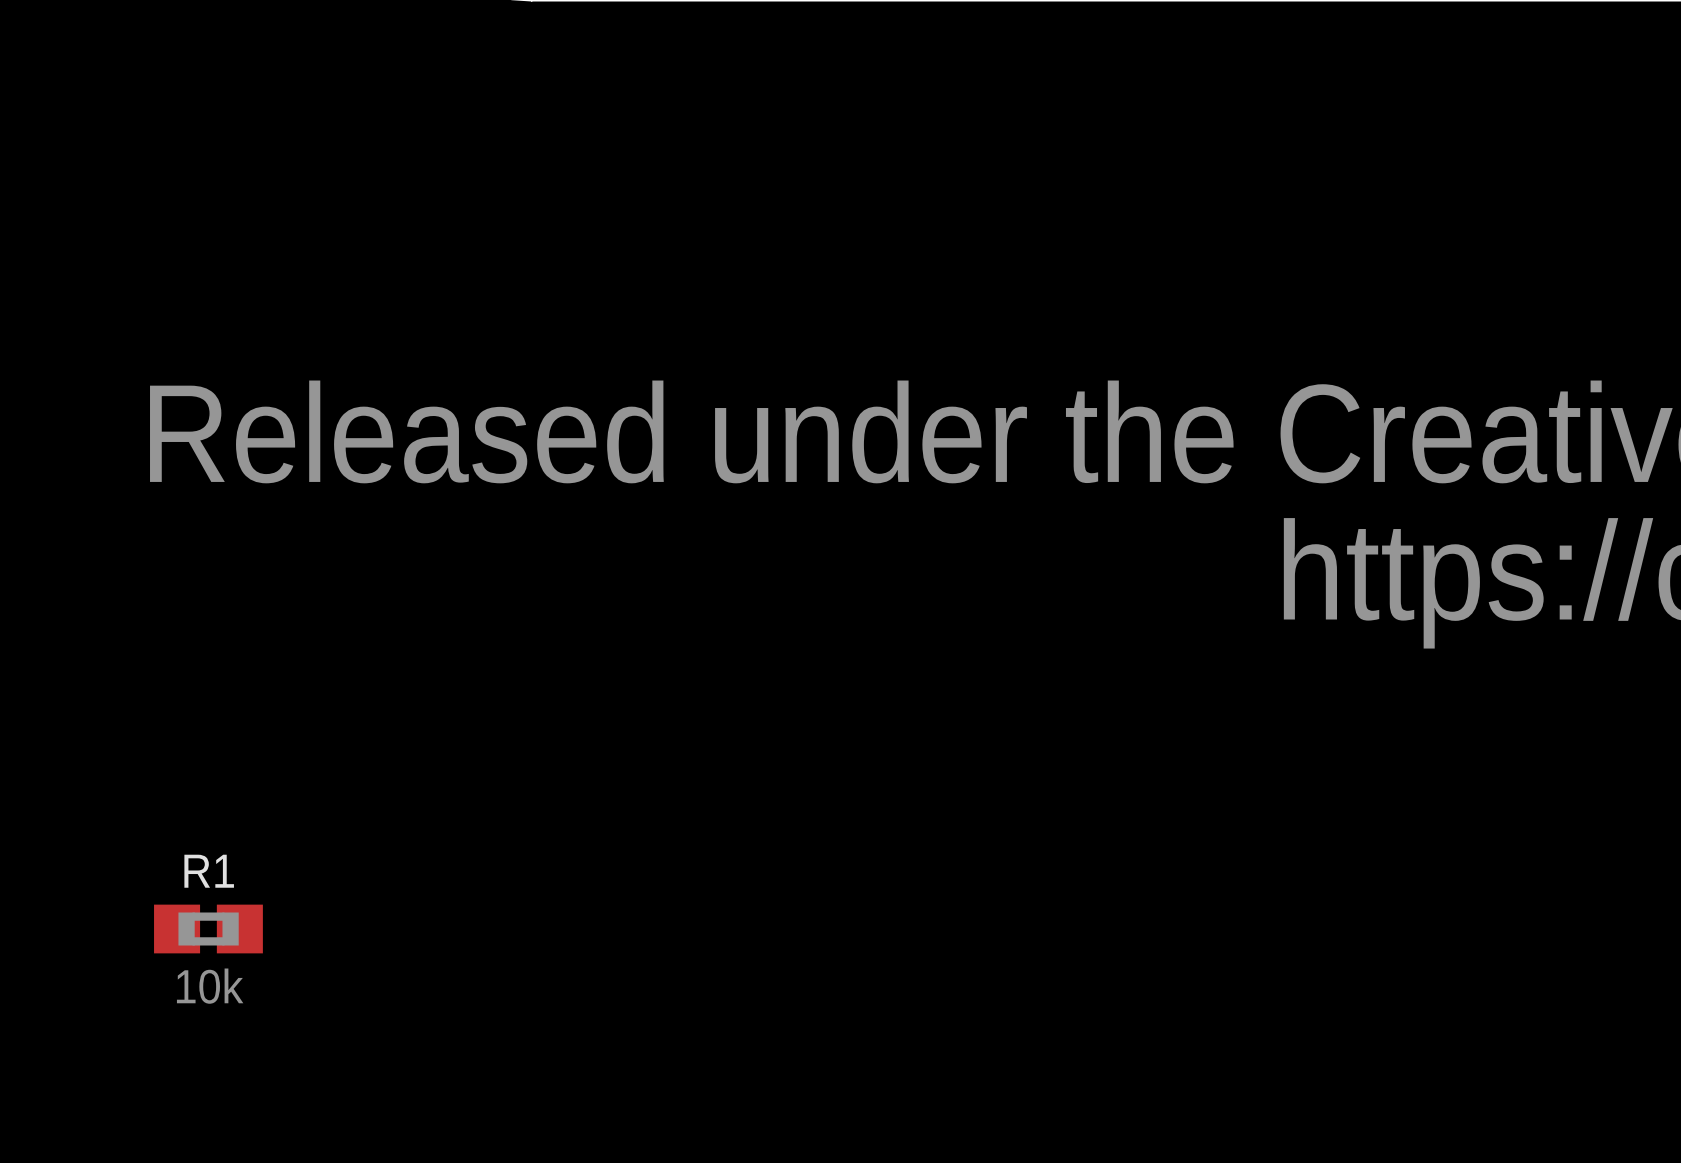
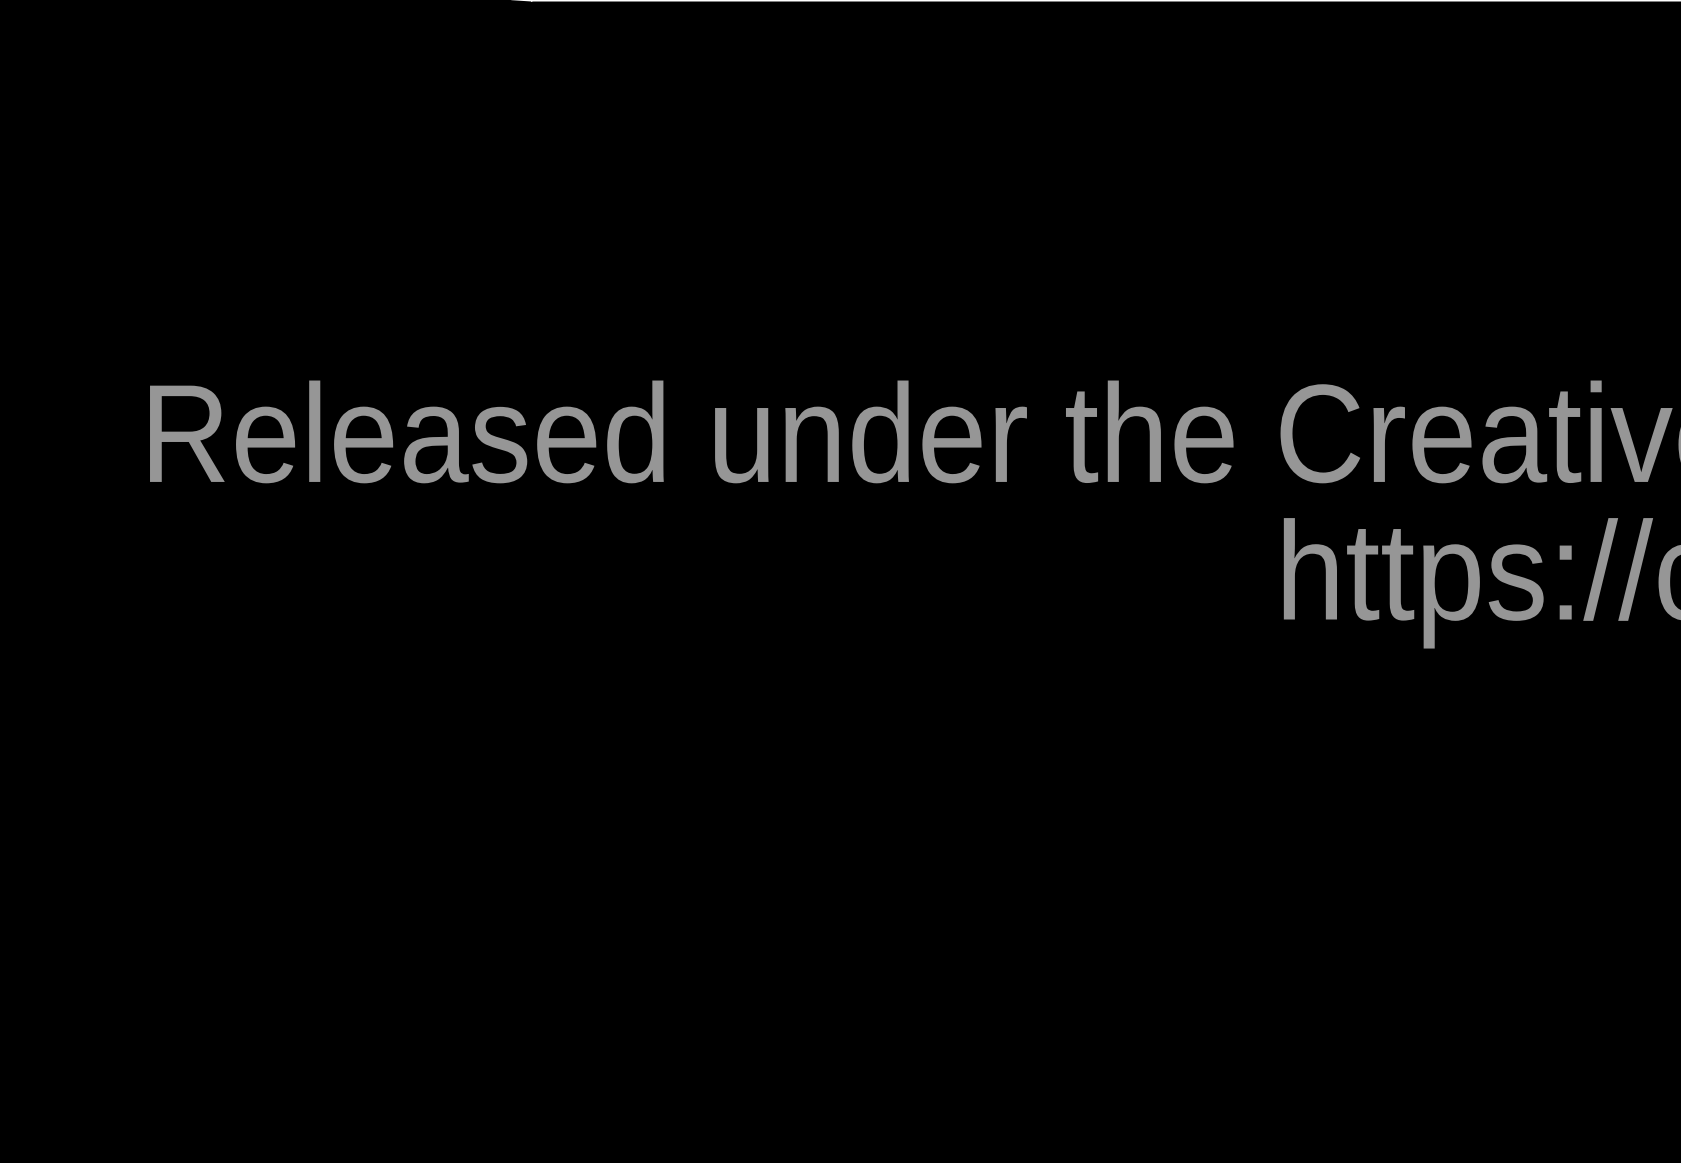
R1: 10k (208, 929) -> none

